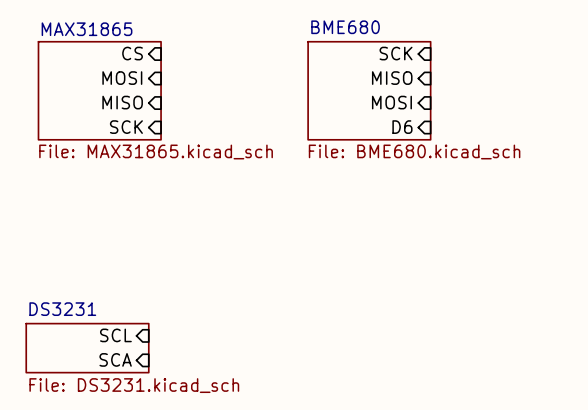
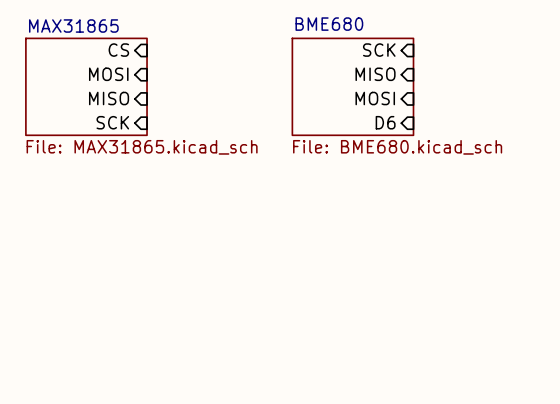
sheet pin: SCL (115, 335) -> none
sheet DS3231: File: DS3231.kicad_sch (87, 348) -> none
sheet pin: SCA (115, 359) -> none

